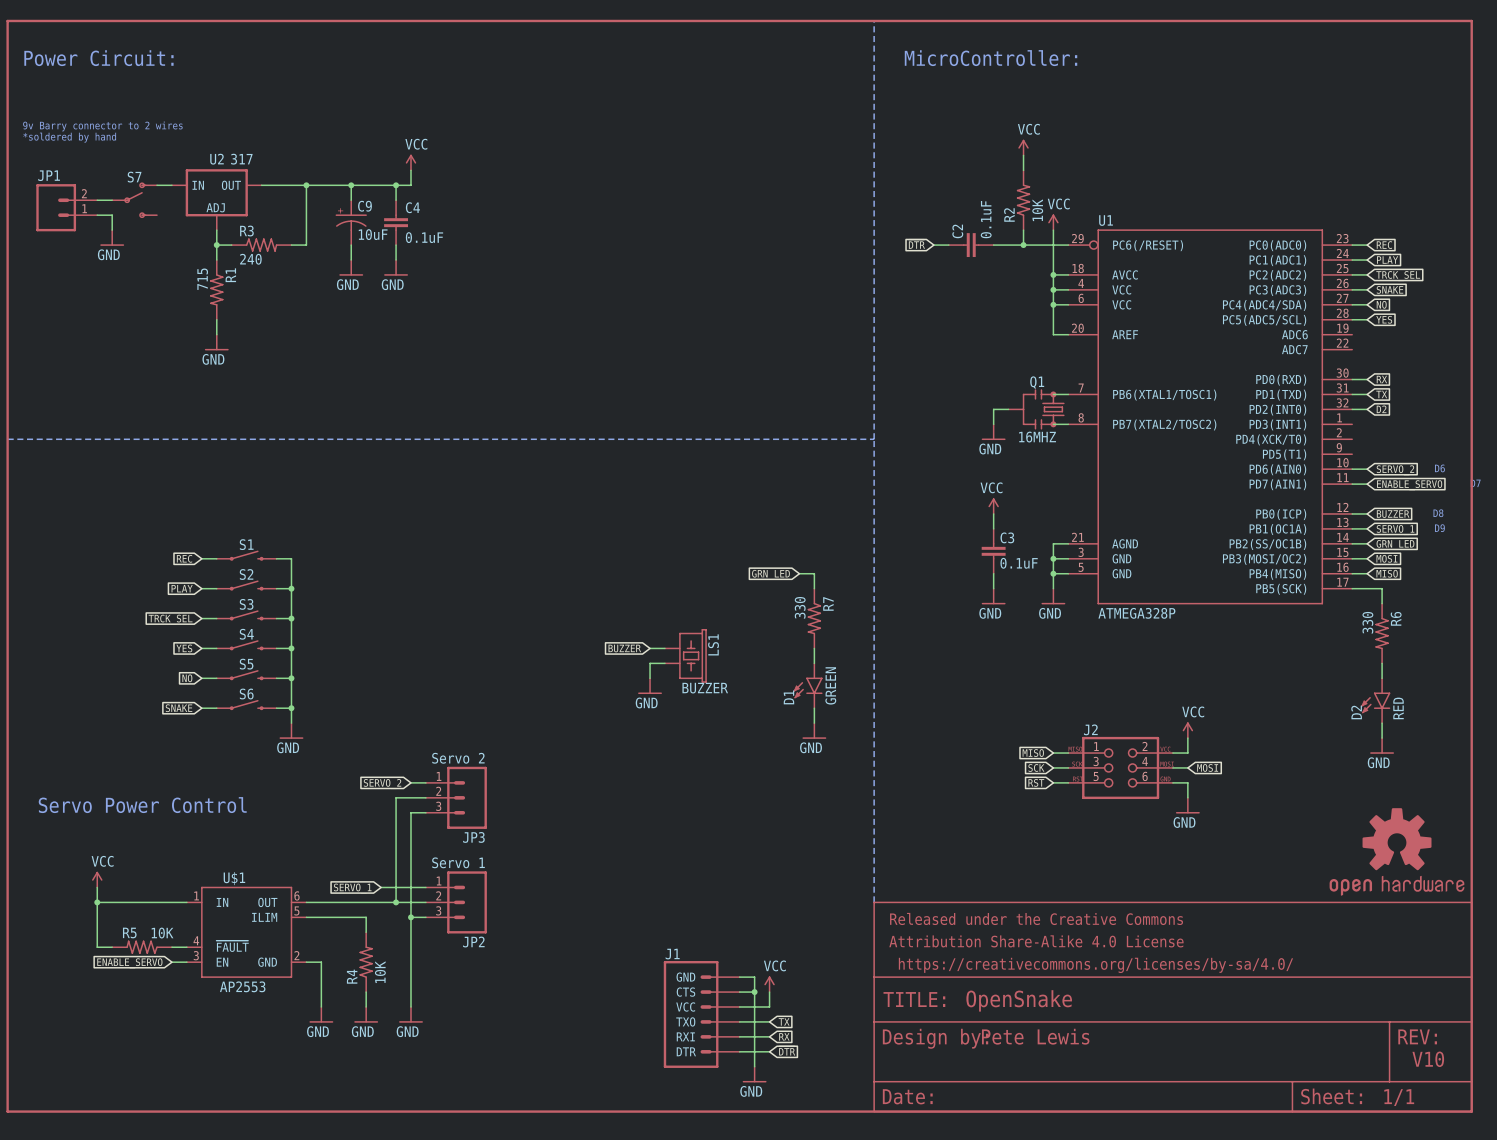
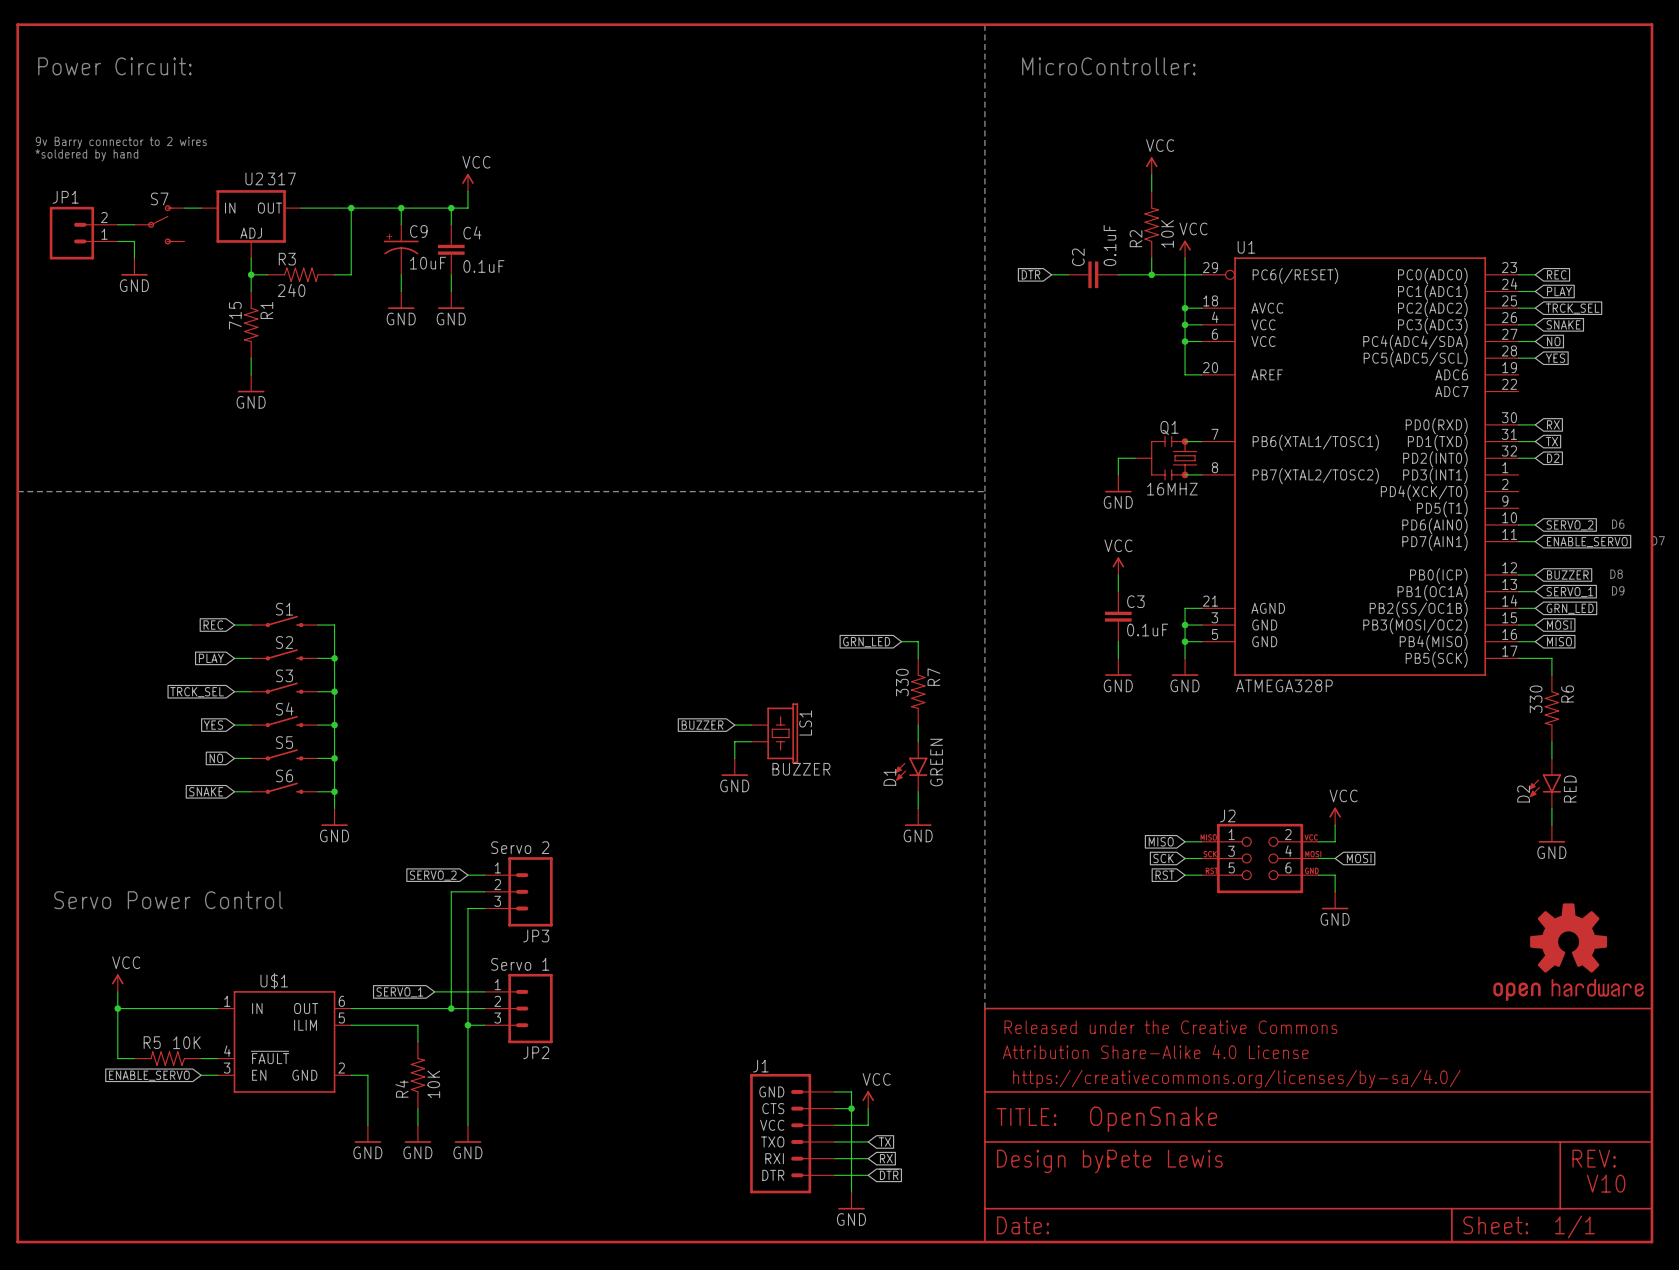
U$1 value: AP2553 (242, 986) -> none

